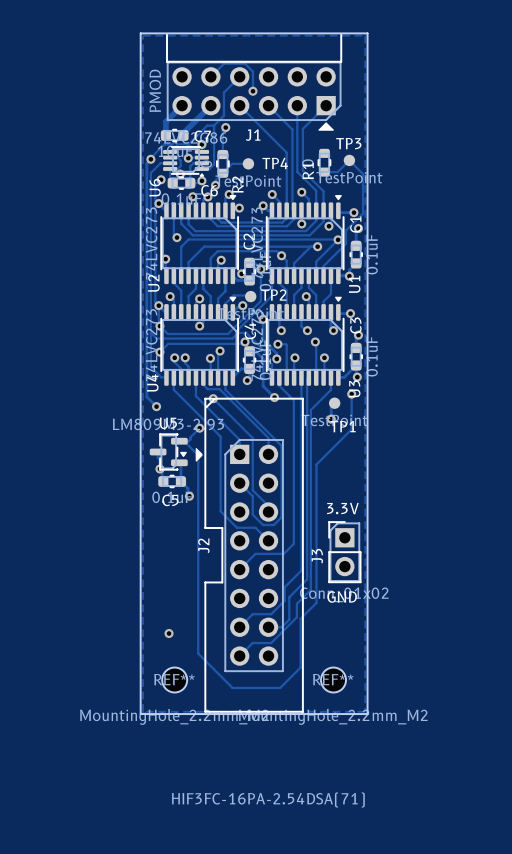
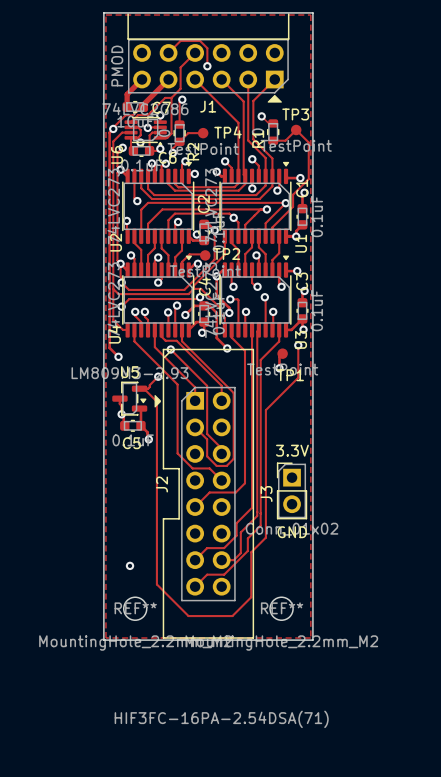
track: none -> (261, 116) (268, 123) (273, 123)
via: none -> (261, 116)
track: none -> (204, 305) (194, 305) (185, 315)
via: none -> (185, 315)

